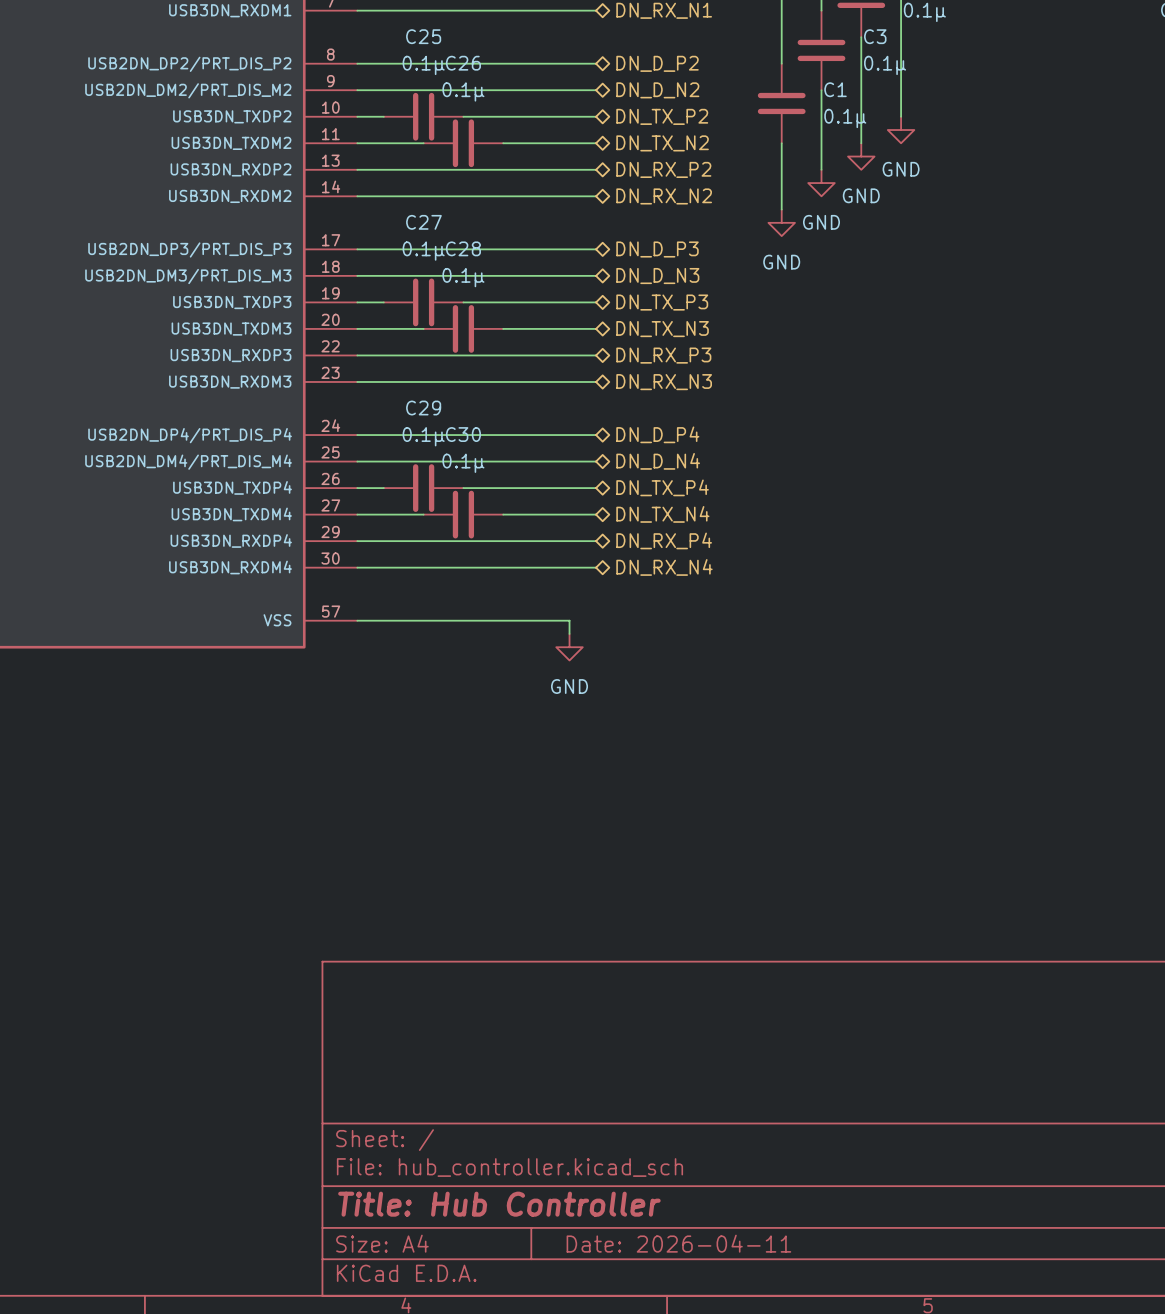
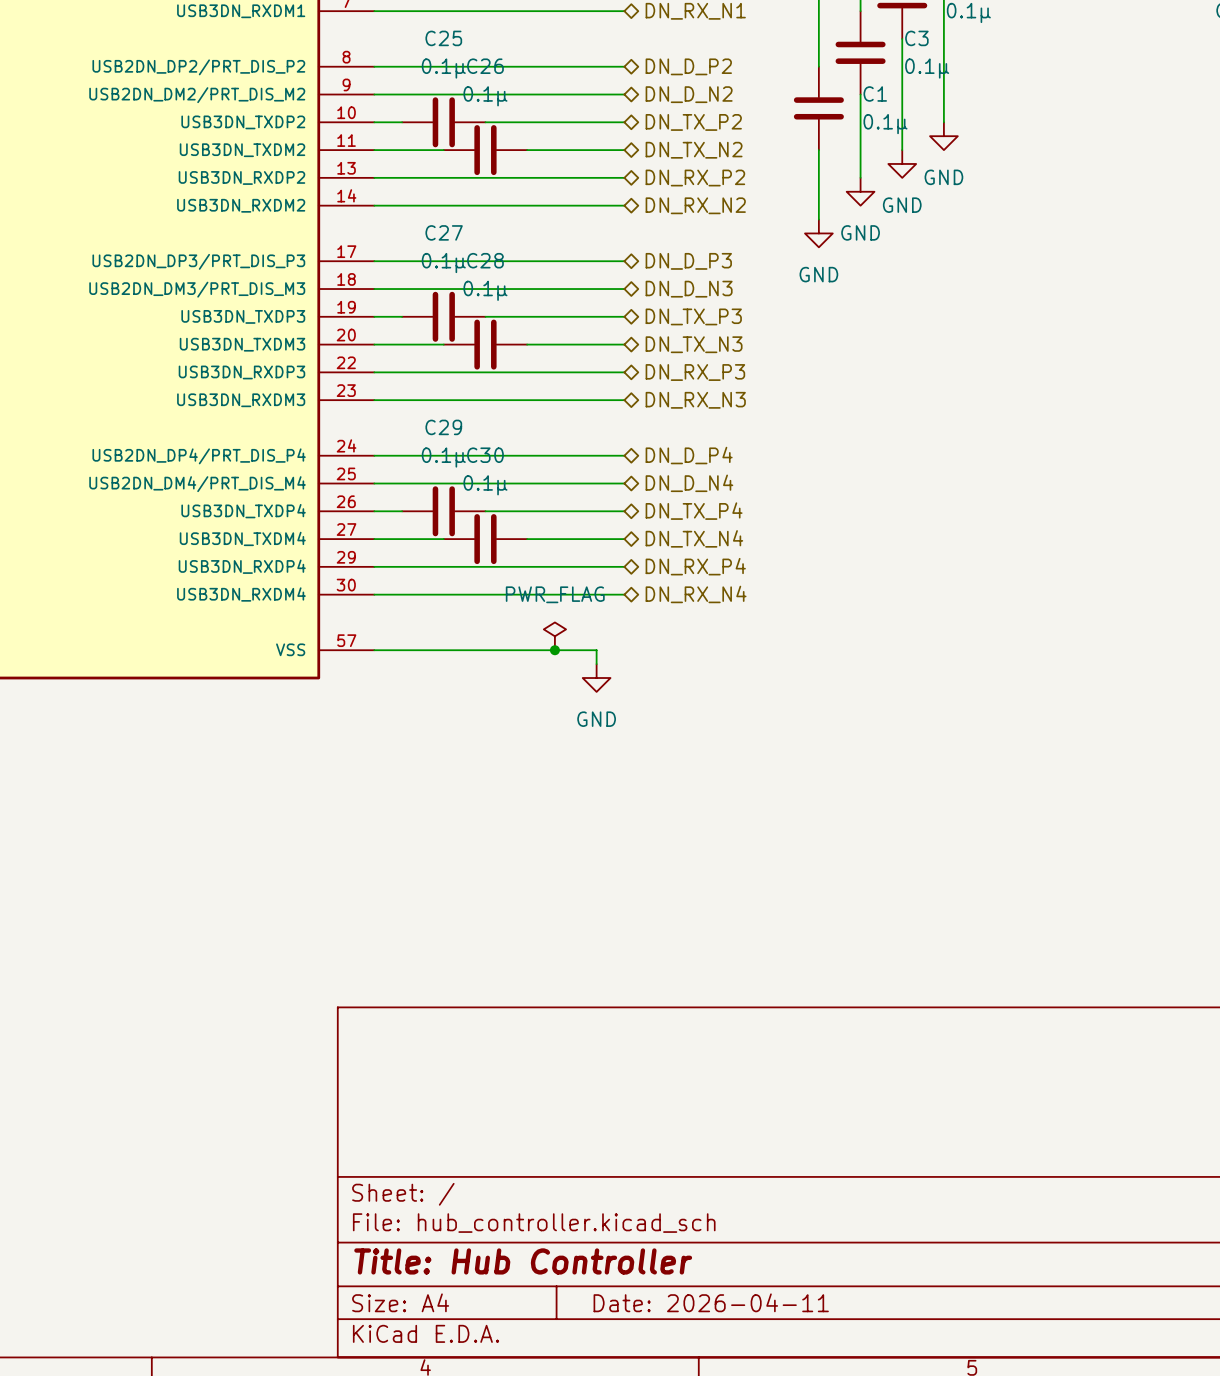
power symbol: none -> PWR_FLAG (554, 636)
junction: none -> (554, 650)

